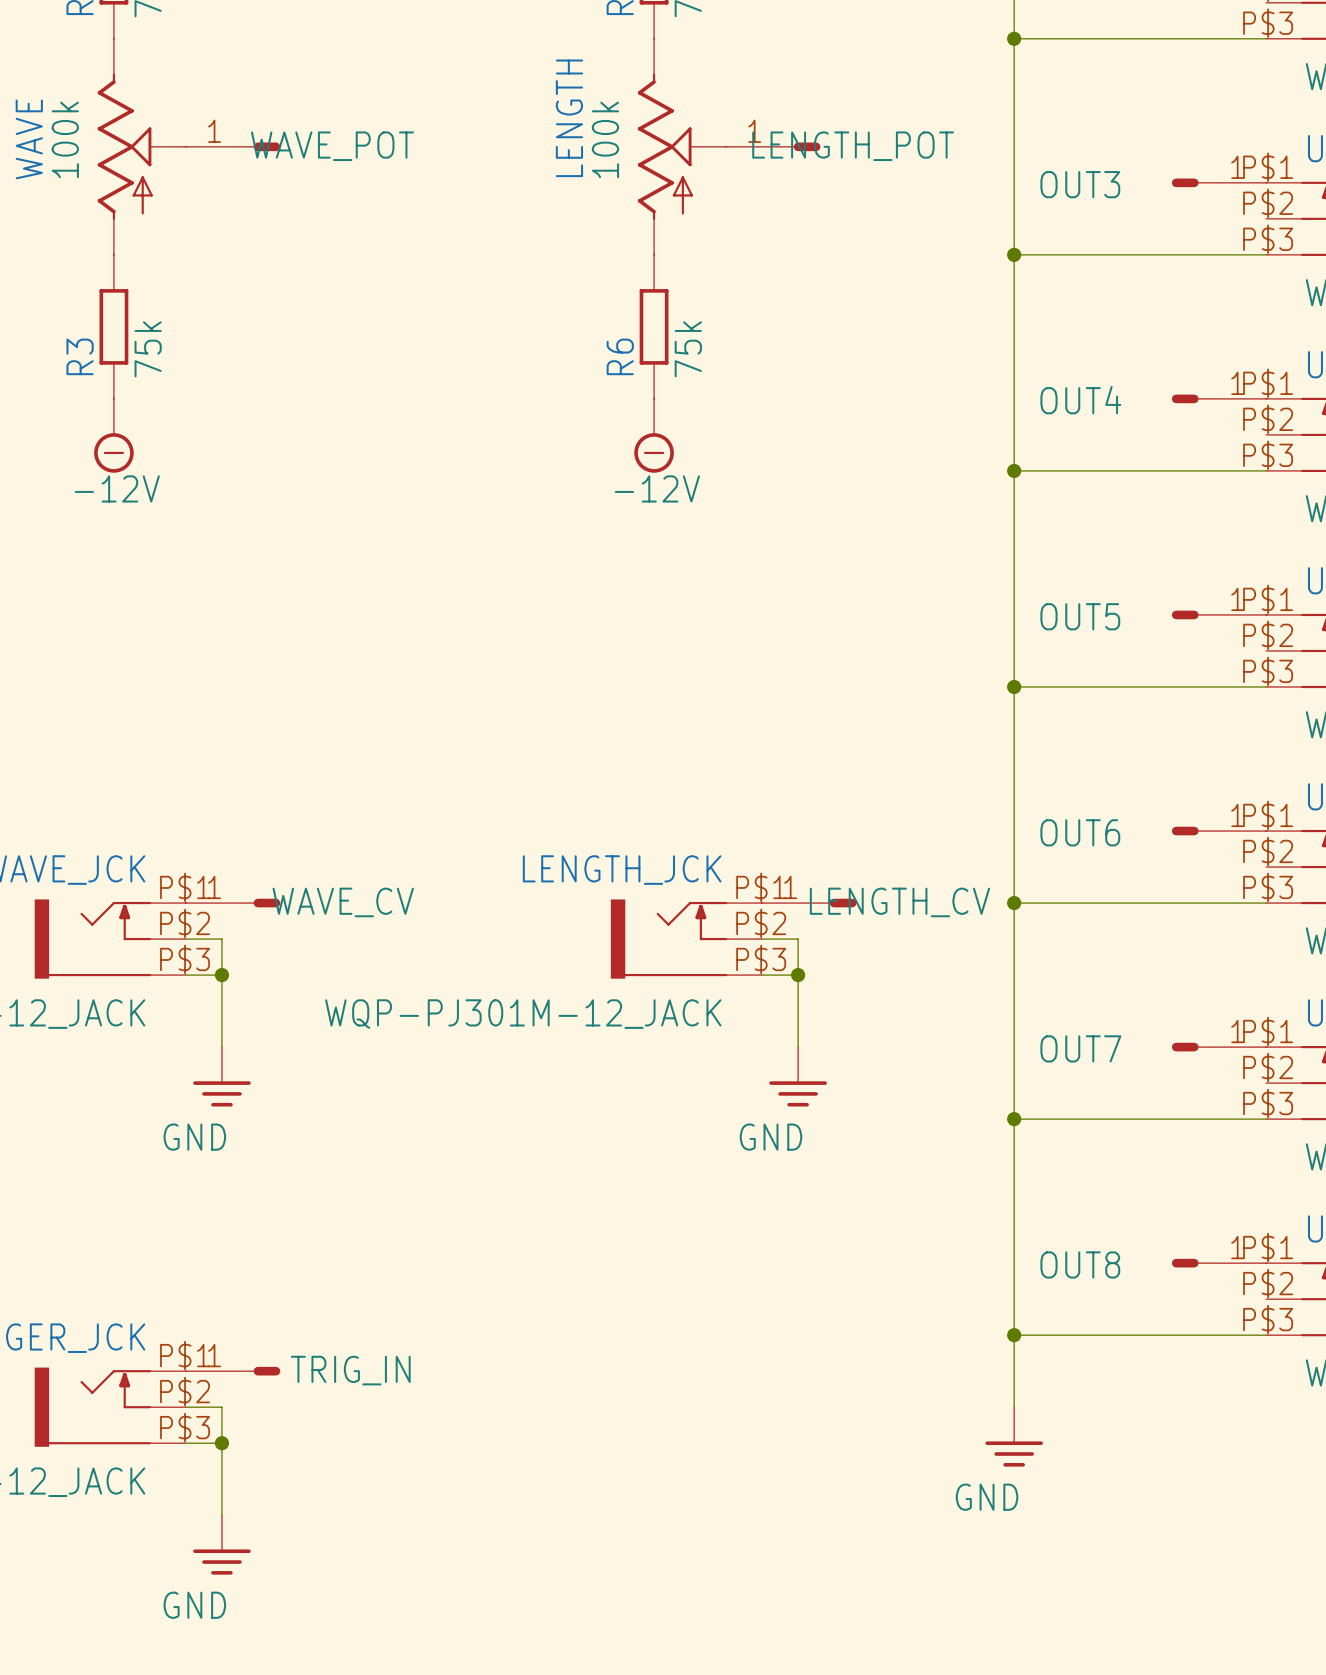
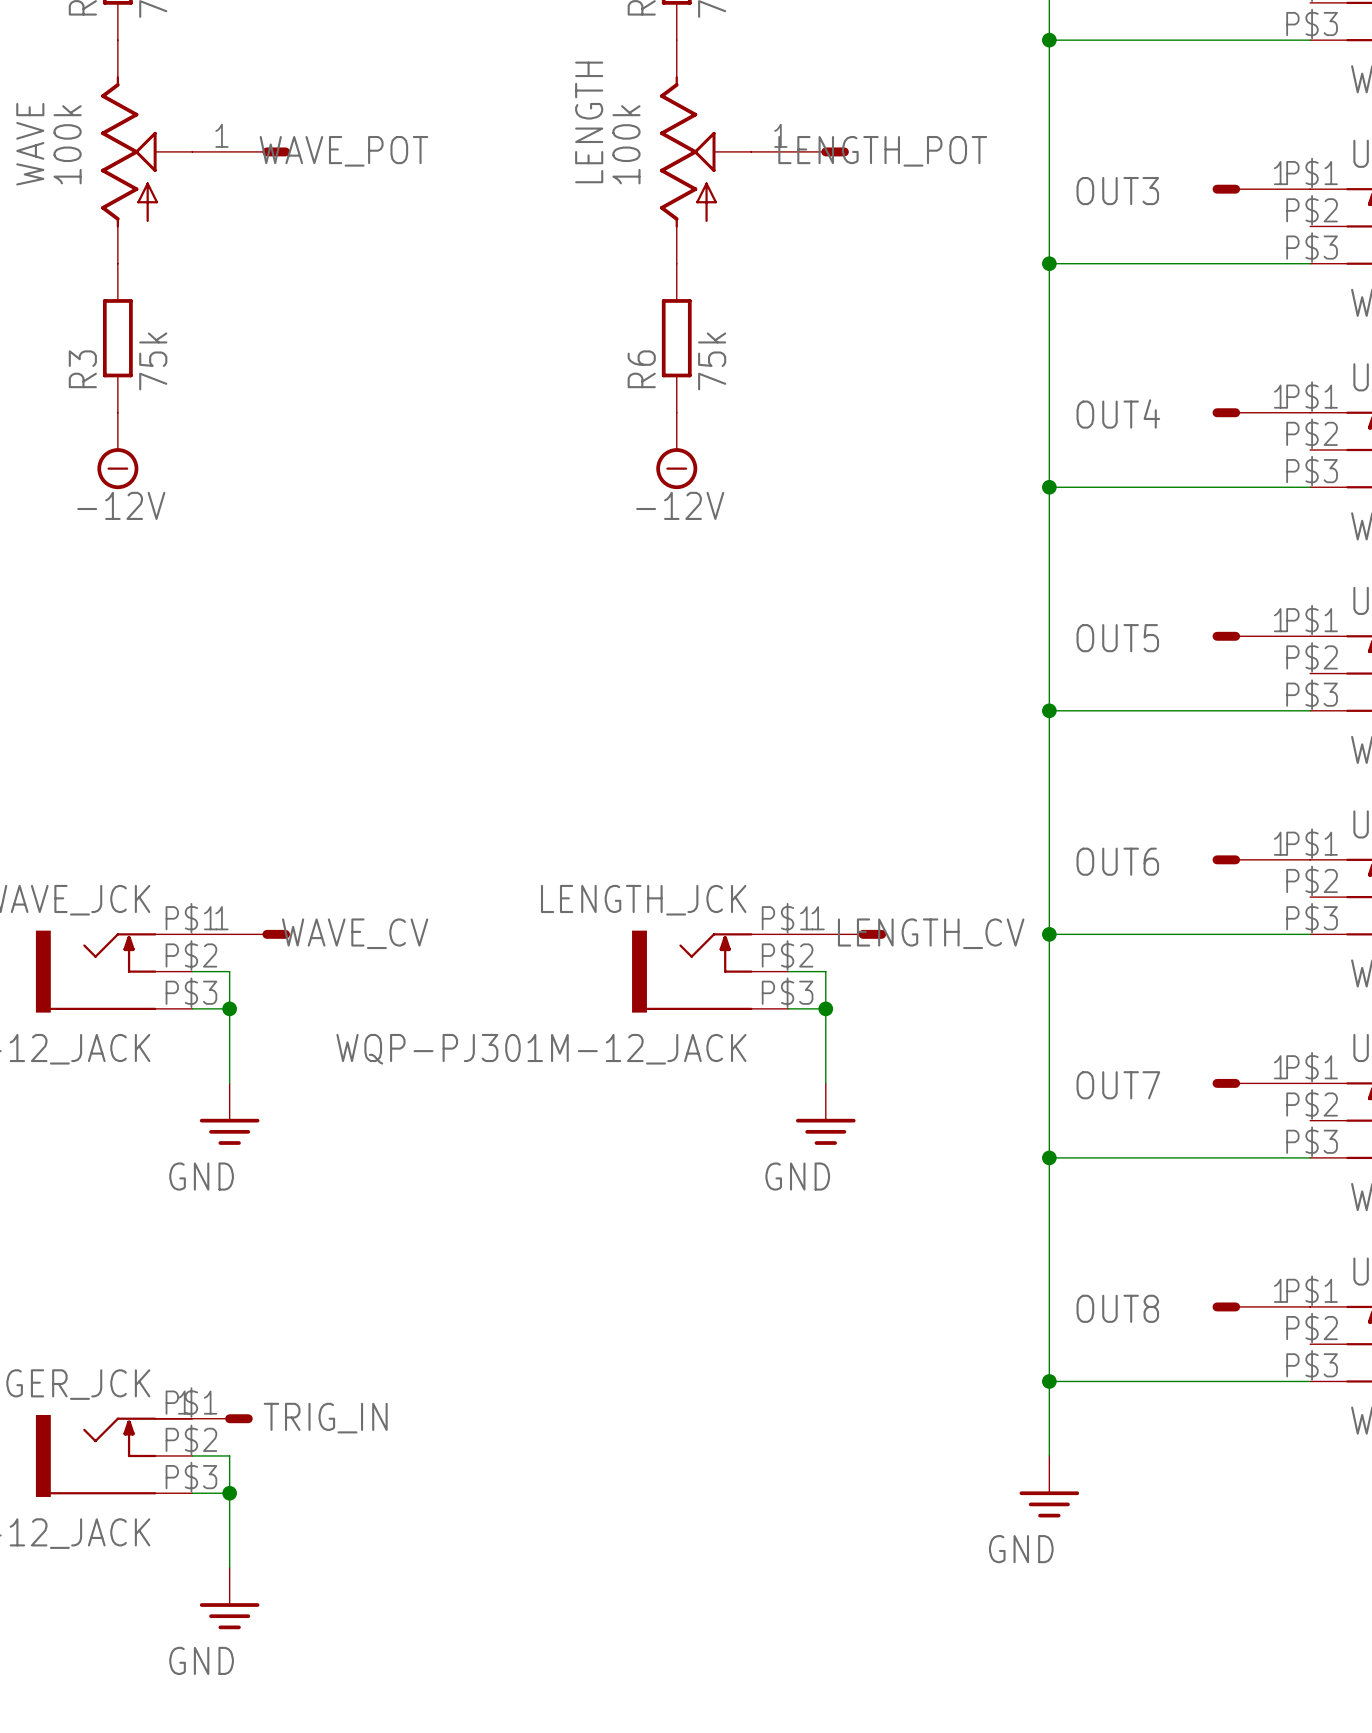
TRIG_IN position: (233, 1371) -> (203, 1418)

